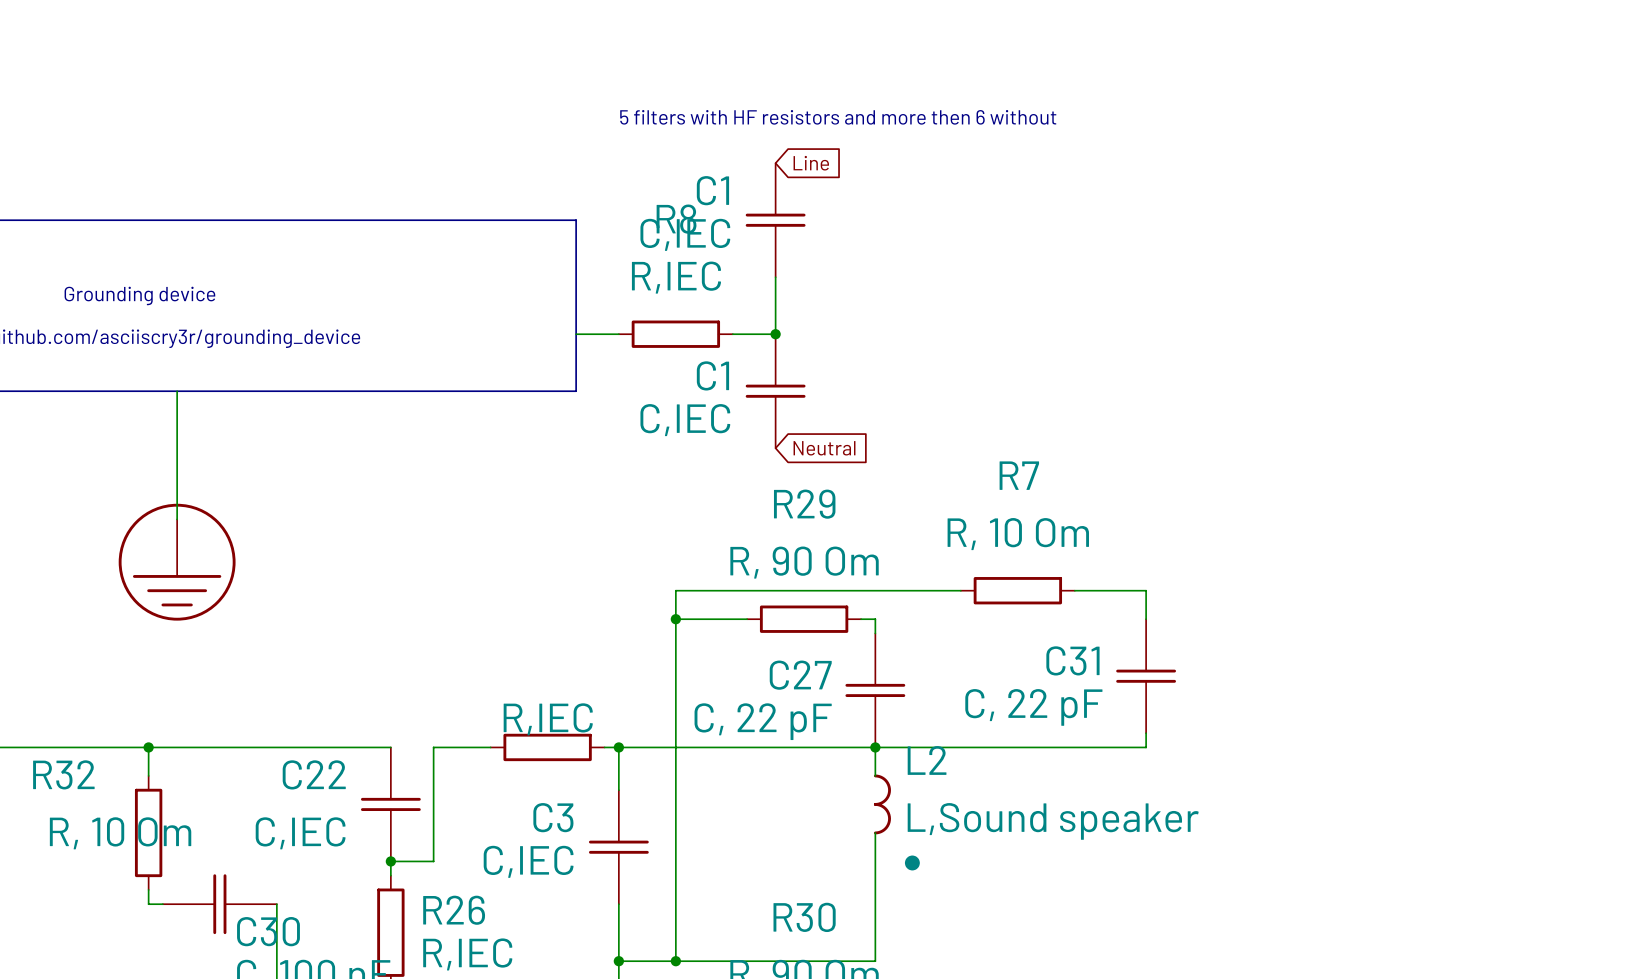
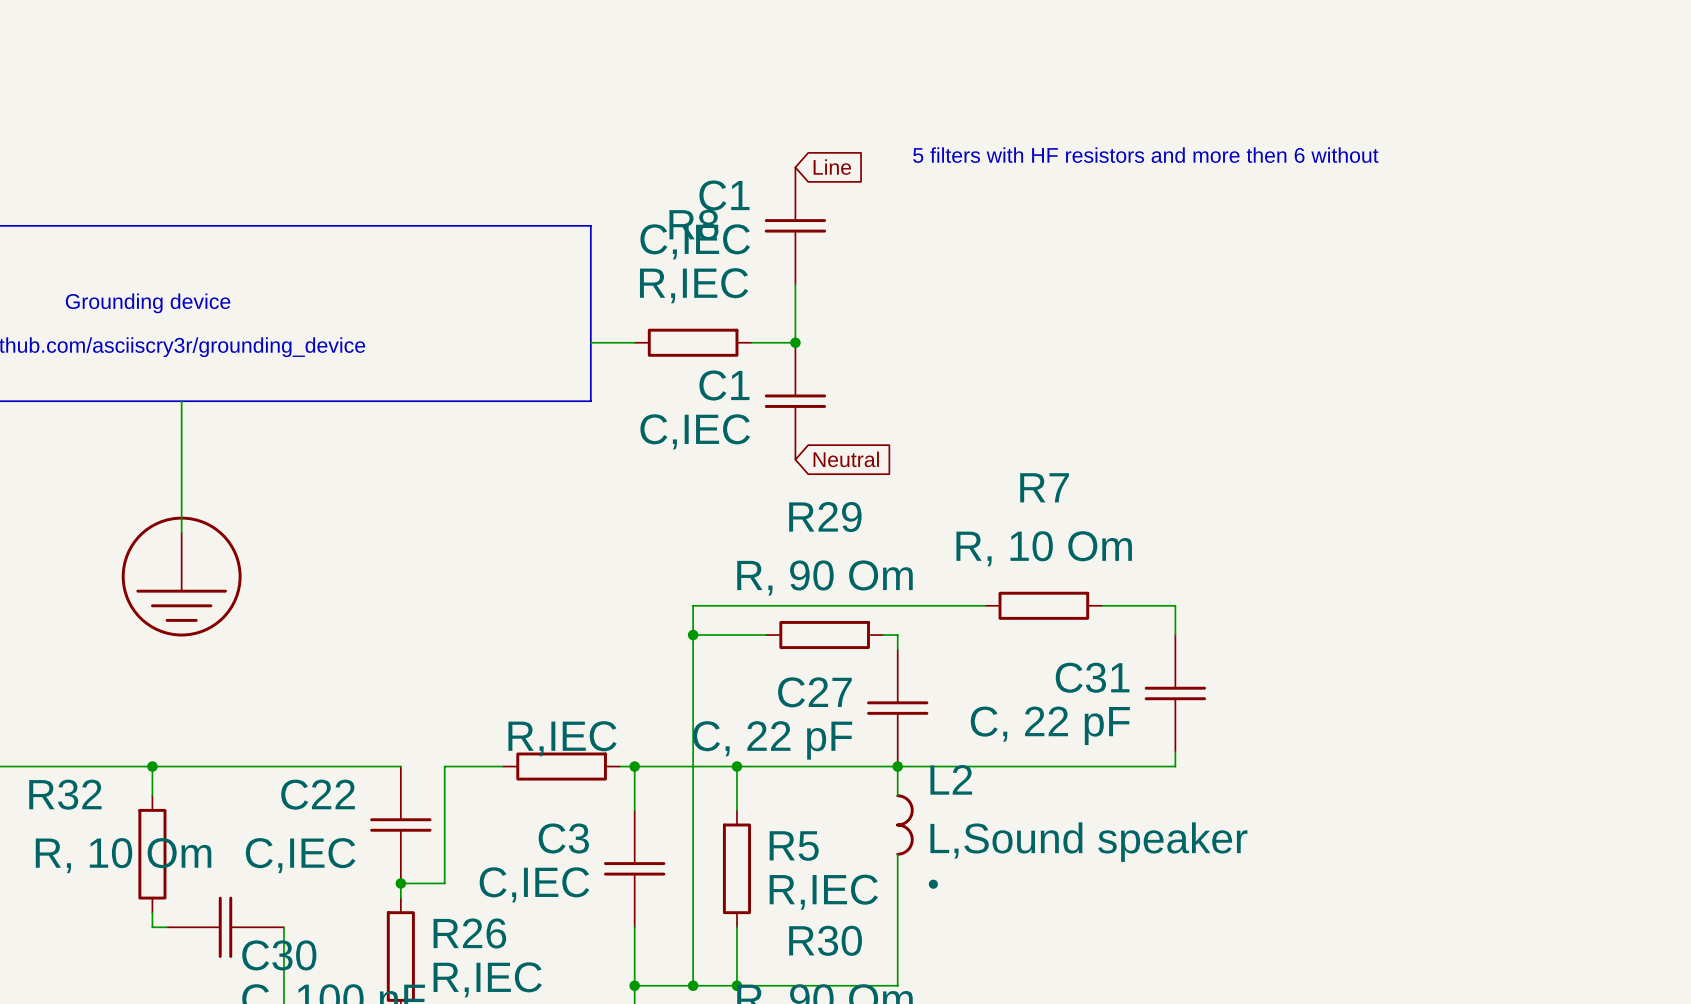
text position: 5 filters with HF resistors and more then 6 without (838, 117) -> 5 filters with HF resistors and more then 6 without (1145, 155)
wire: none -> (736, 766) (736, 810)
junction: none -> (736, 766)
R5: none -> R,IEC (736, 868)
wire: none -> (736, 927) (736, 985)
junction: none -> (736, 985)

